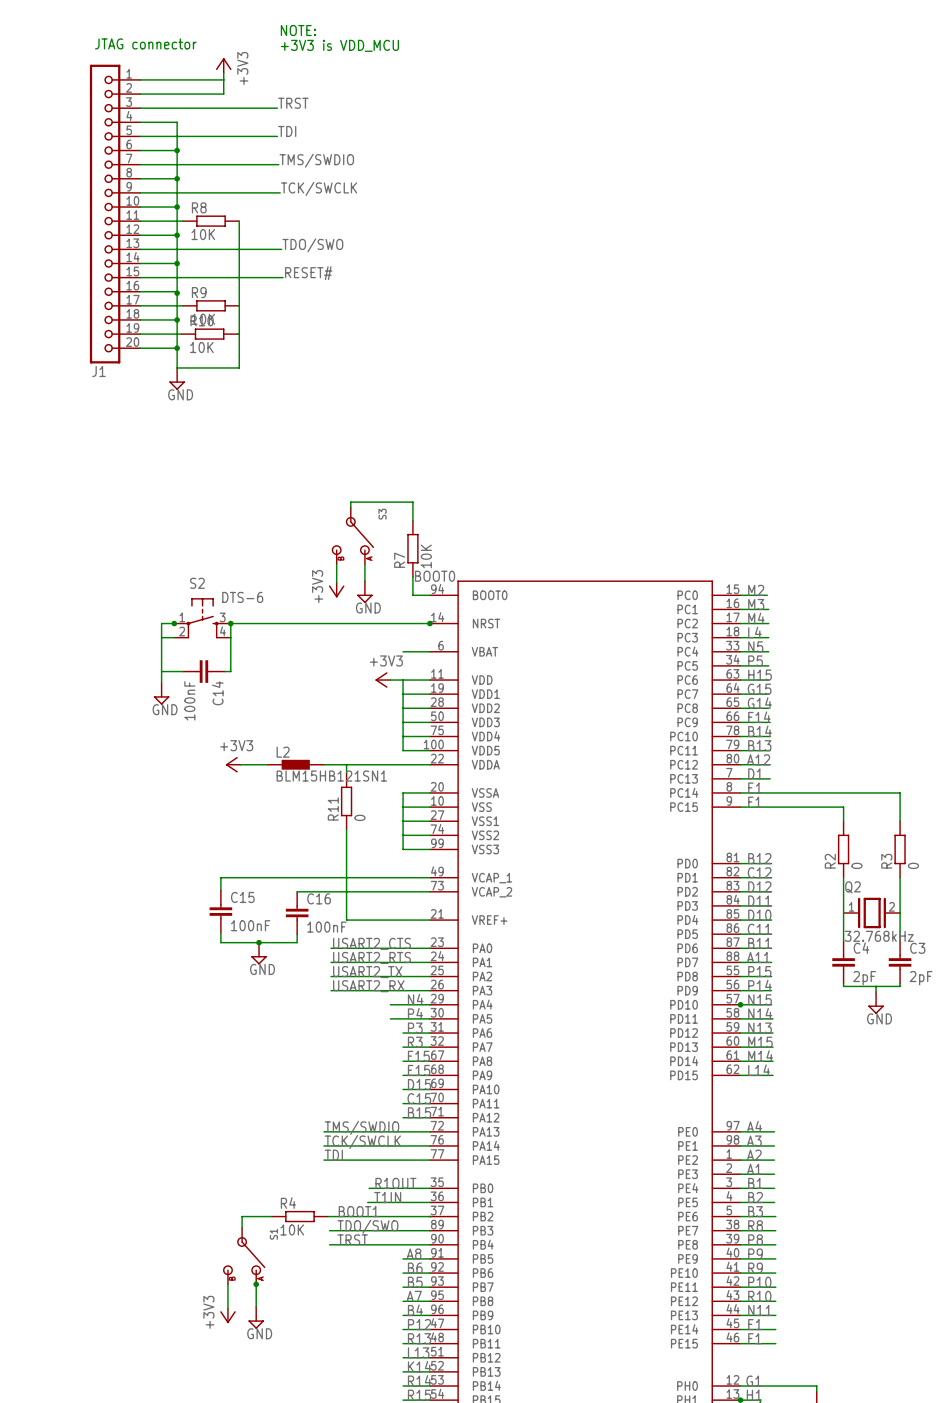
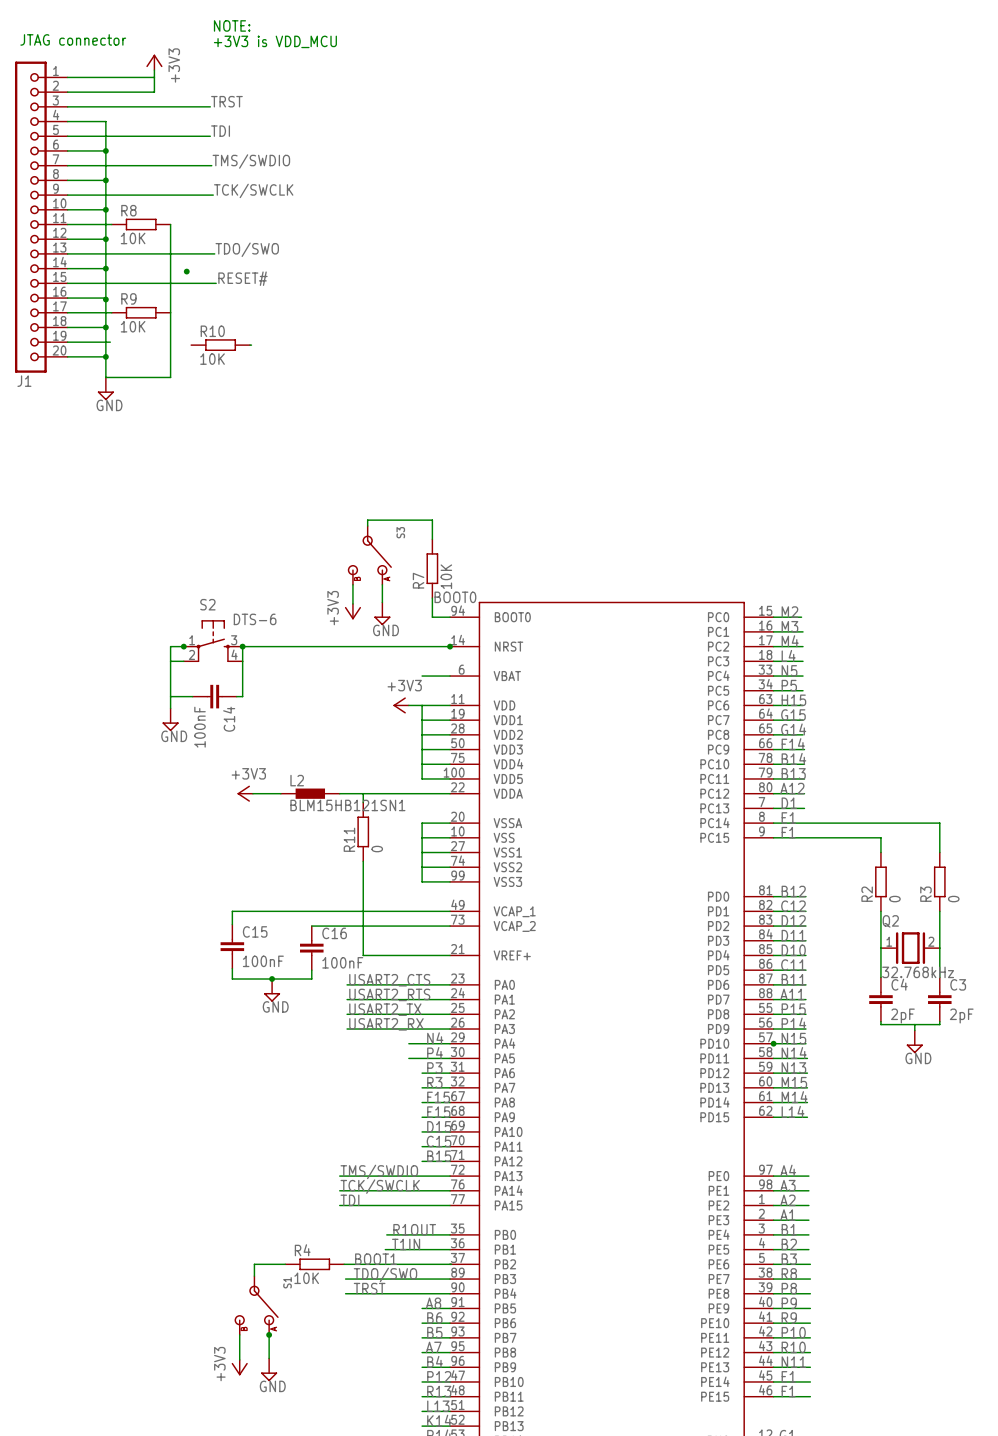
text position: NOTE: (298, 30) -> NOTE: (232, 25)
text position: JTAG connector (145, 43) -> JTAG connector (73, 39)
text position: +3V3 is VDD_MCU (339, 45) -> +3V3 is VDD_MCU (275, 41)
power symbol position: +3V3 (223, 65) -> +3V3 (154, 62)
wire: (223, 72) (223, 94) (140, 94) -> (154, 70) (154, 92) (67, 92)
wire: (140, 79) (223, 79) -> (67, 77) (154, 77)
label position: TRST (293, 103) -> TRST (226, 101)
wire: (140, 108) (277, 108) -> (67, 106) (210, 106)
wire: (140, 122) (177, 122) (177, 367) (239, 367) (239, 221) -> (67, 121) (105, 121) (105, 377) (170, 377) (170, 224)
label position: TDI (287, 131) -> TDI (220, 131)
wire: (140, 136) (277, 136) -> (67, 136) (210, 136)
junction: none -> (105, 150)
wire: (140, 150) (177, 150) -> (67, 150) (105, 150)
junction: (177, 150) -> none
label position: TMS/SWDIO (316, 160) -> TMS/SWDIO (251, 161)
wire: (140, 164) (278, 164) -> (67, 165) (211, 165)
junction: none -> (105, 180)
wire: (140, 178) (177, 178) -> (67, 180) (105, 180)
junction: (177, 178) -> none
label position: TCK/SWCLK (319, 188) -> TCK/SWCLK (253, 190)
wire: (140, 192) (280, 192) -> (67, 195) (213, 195)
junction: none -> (105, 209)
wire: (140, 207) (177, 207) -> (67, 209) (105, 209)
junction: (177, 207) -> none
J1 position: (115, 214) -> (41, 217)
wire: (140, 221) (182, 221) -> (67, 224) (111, 224)
R8 position: (211, 221) -> (141, 224)
junction: none -> (105, 239)
wire: (140, 235) (177, 235) -> (67, 239) (105, 239)
junction: (177, 235) -> none
label position: TDO/SWO (312, 245) -> TDO/SWO (247, 249)
wire: (140, 249) (281, 249) -> (67, 253) (214, 253)
junction: none -> (105, 268)
wire: (140, 263) (177, 263) -> (67, 268) (105, 268)
label position: RESET# (308, 273) -> RESET# (242, 278)
wire: (140, 277) (283, 277) -> (67, 283) (216, 283)
junction: none -> (105, 299)
wire: (140, 291) (177, 291) -> (67, 298) (105, 298)
junction: (177, 293) -> none
wire: (140, 305) (182, 305) -> (67, 312) (111, 312)
R9 position: (211, 305) -> (141, 312)
junction: none -> (105, 327)
wire: (140, 319) (177, 319) -> (67, 327) (105, 327)
junction: (177, 319) -> none
wire: (140, 334) (181, 334) -> (67, 342) (110, 342)
junction: none -> (105, 356)
wire: (140, 348) (177, 348) -> (67, 356) (105, 356)
junction: (177, 348) -> none
power symbol position: GND (177, 378) -> GND (105, 388)

